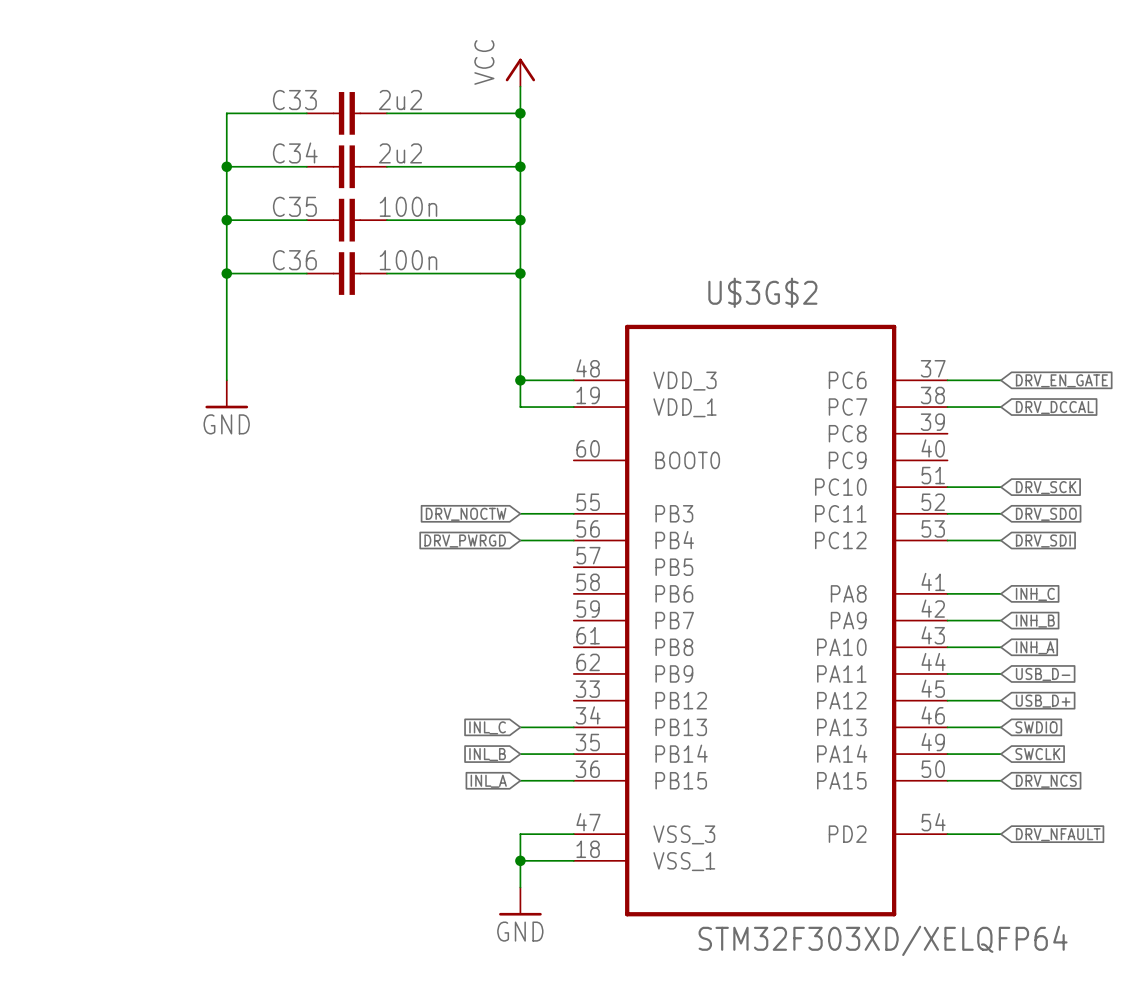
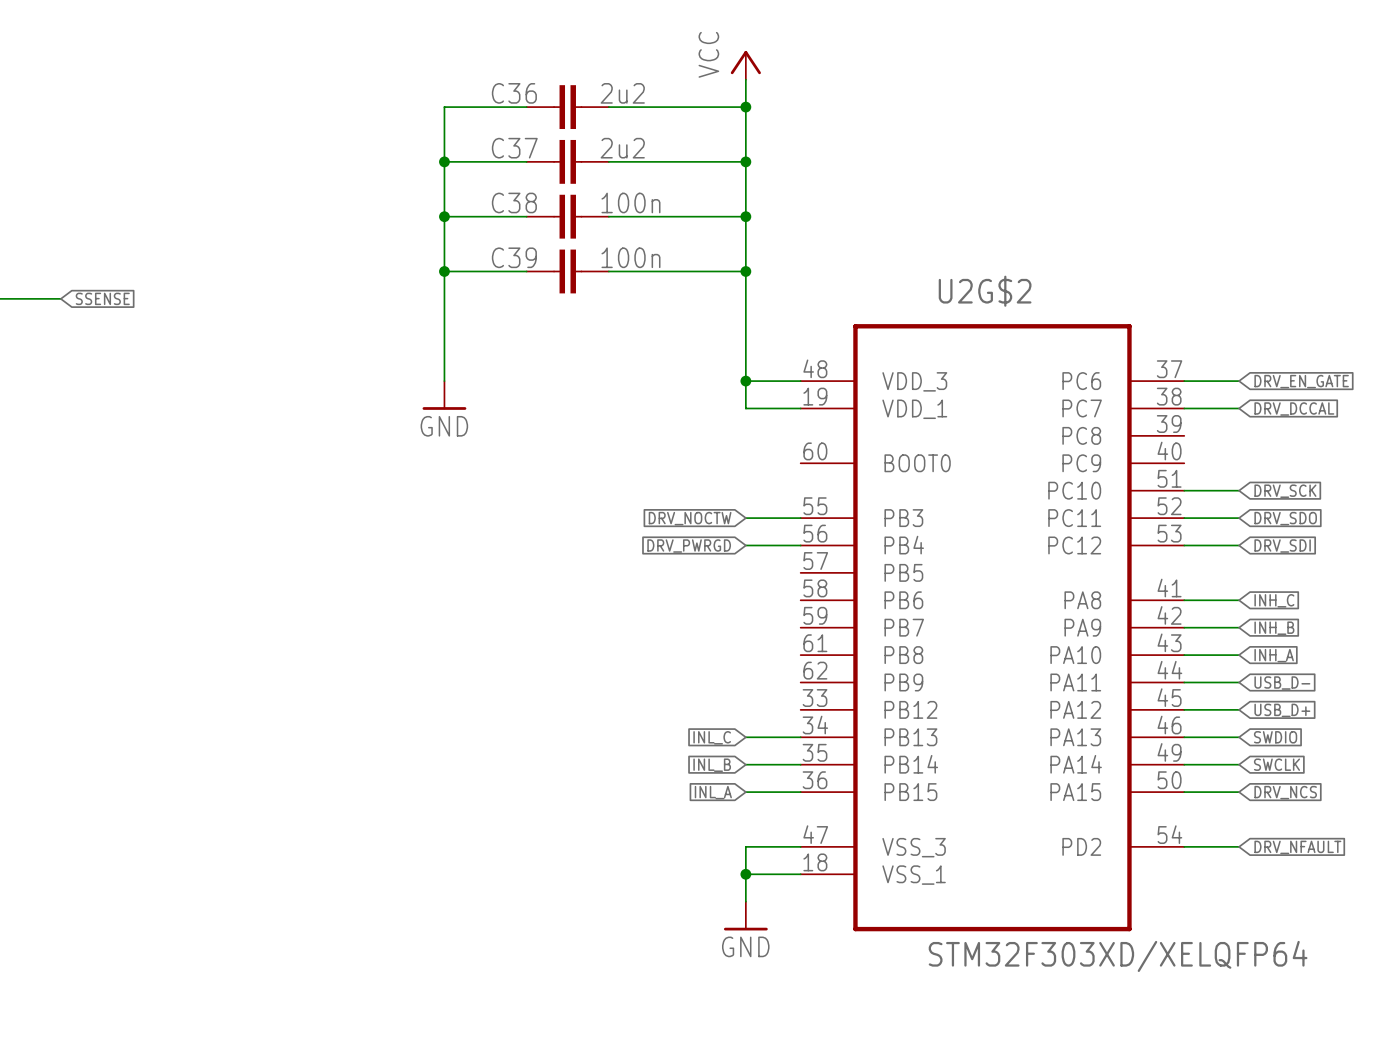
C33 name: C33 (294, 100) -> C36 (514, 93)
C34 name: C34 (295, 152) -> C37 (514, 148)
C35 name: C35 (294, 206) -> C38 (514, 202)
C36 name: C36 (294, 260) -> C39 (514, 257)
U$3G$2 name: U$3G$2 (762, 292) -> U2G$2 (985, 291)

